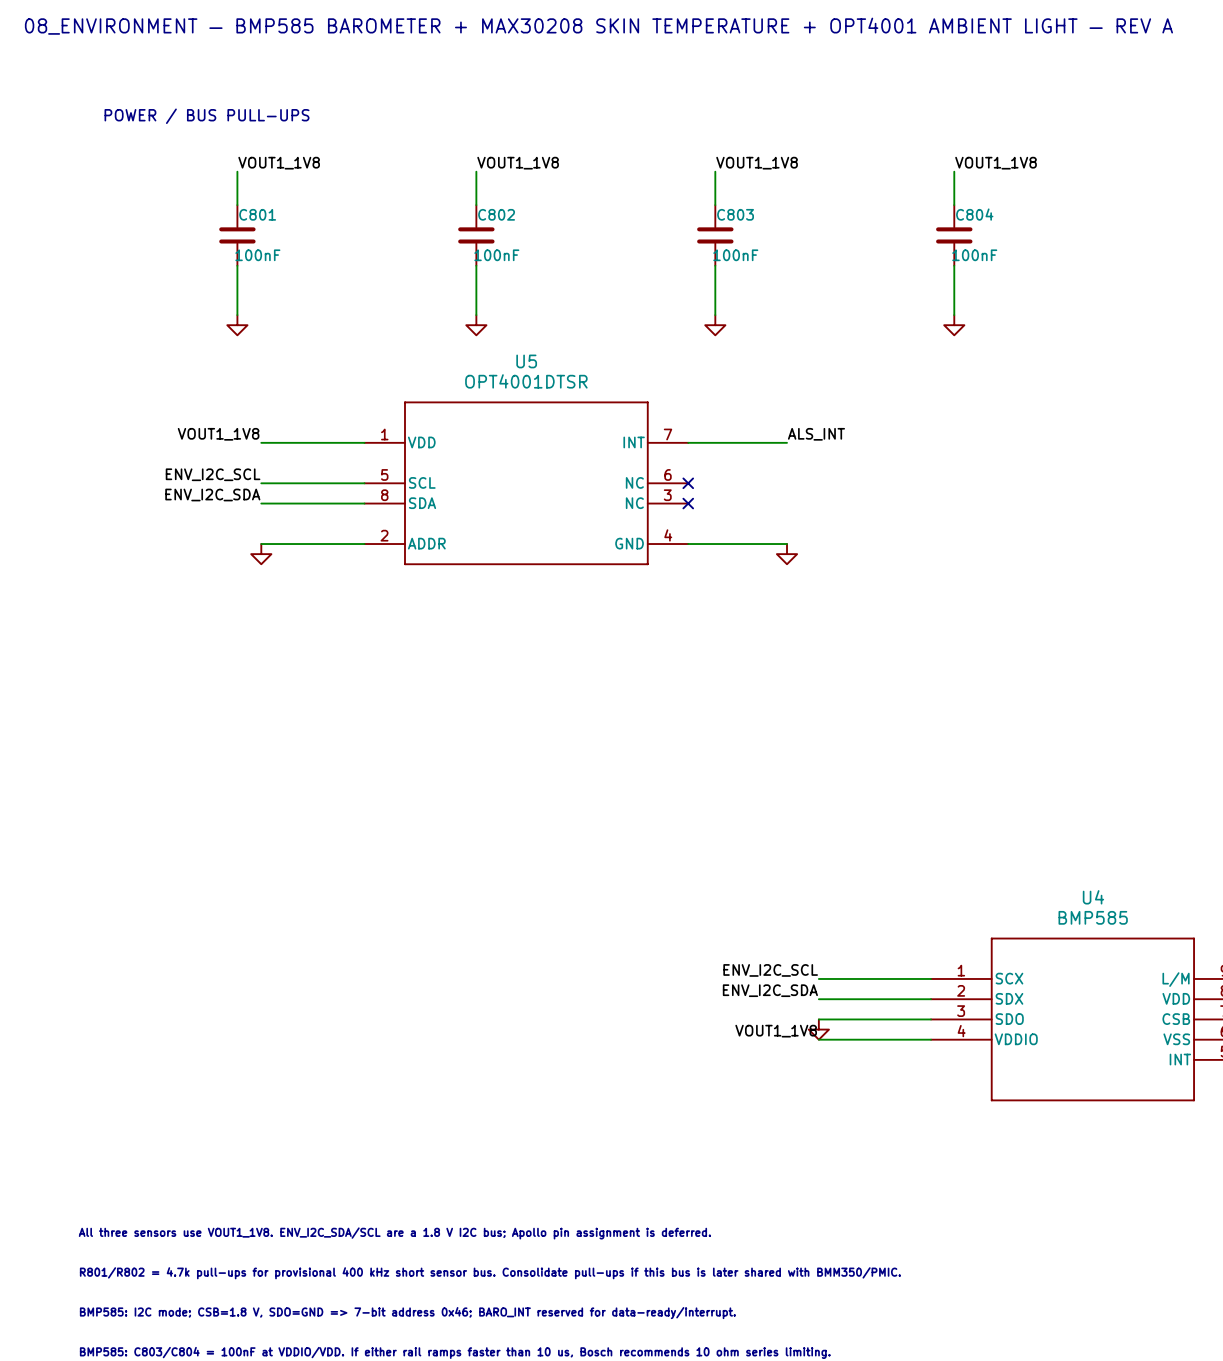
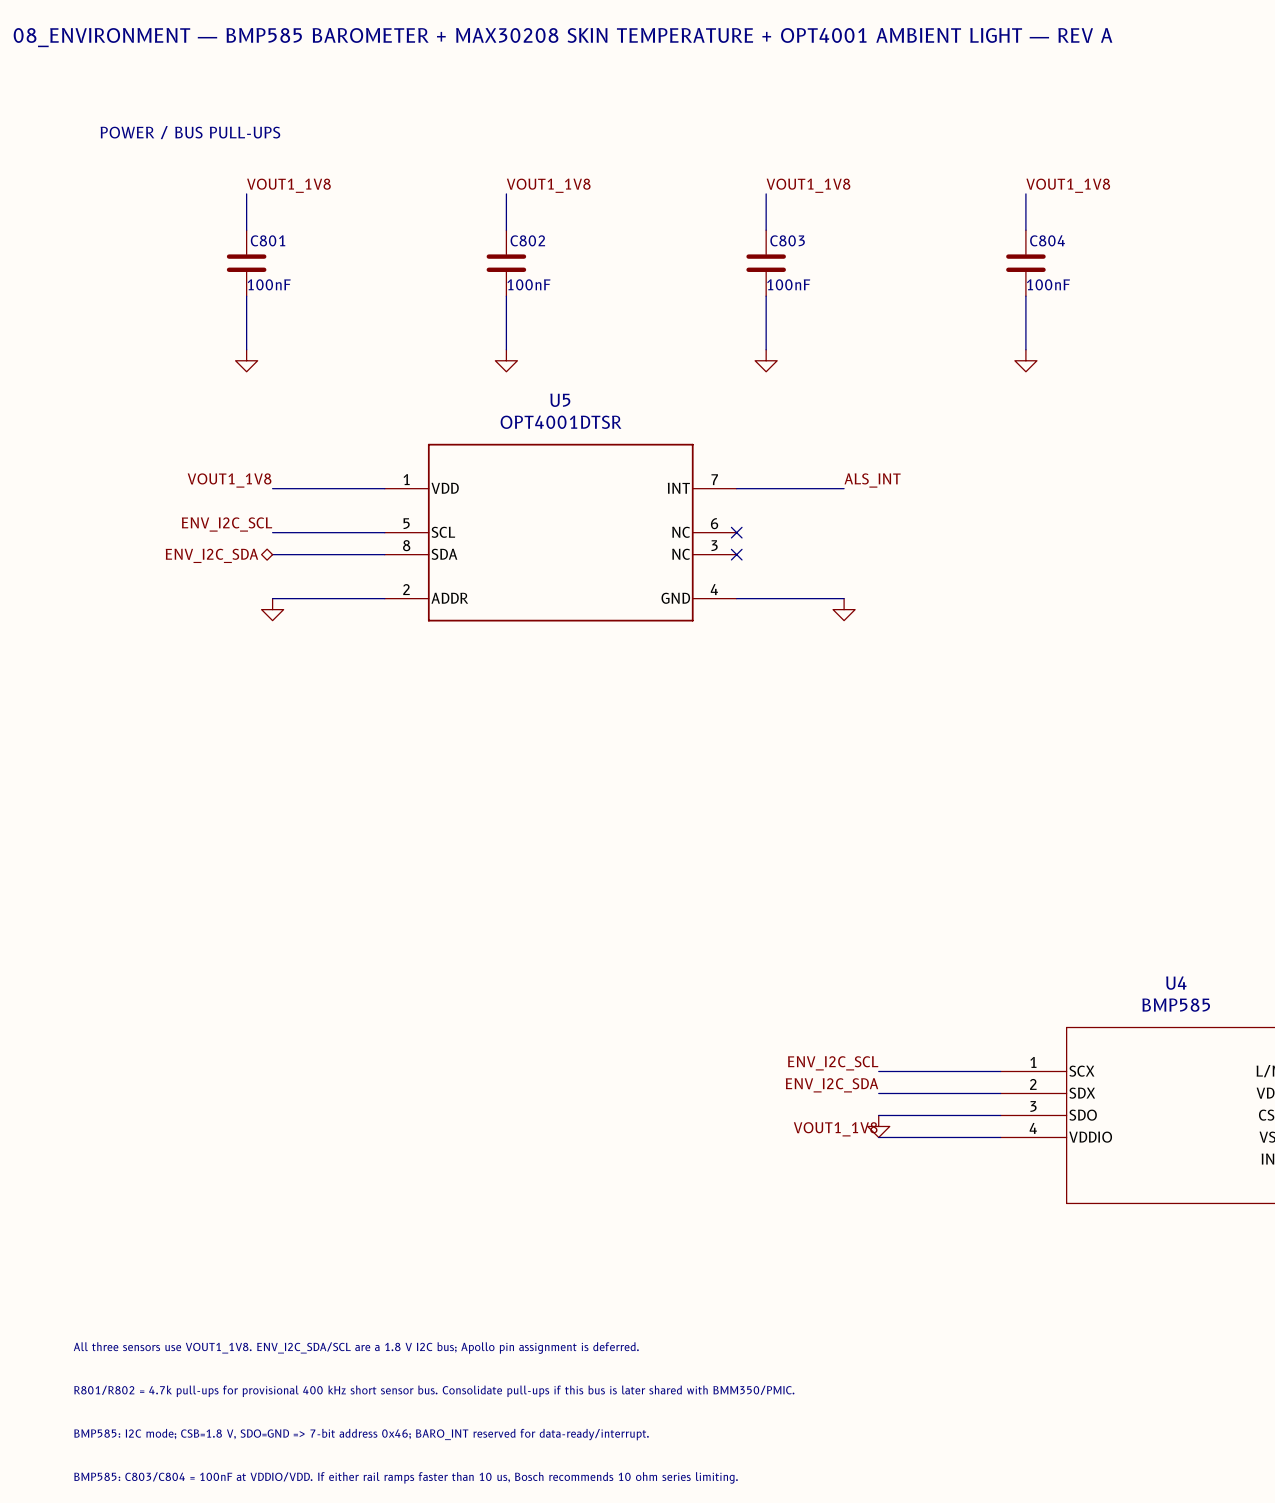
label: ENV_I2C_SDA (212, 495) -> none
hierarchical label: none -> ENV_I2C_SDA (211, 555)

